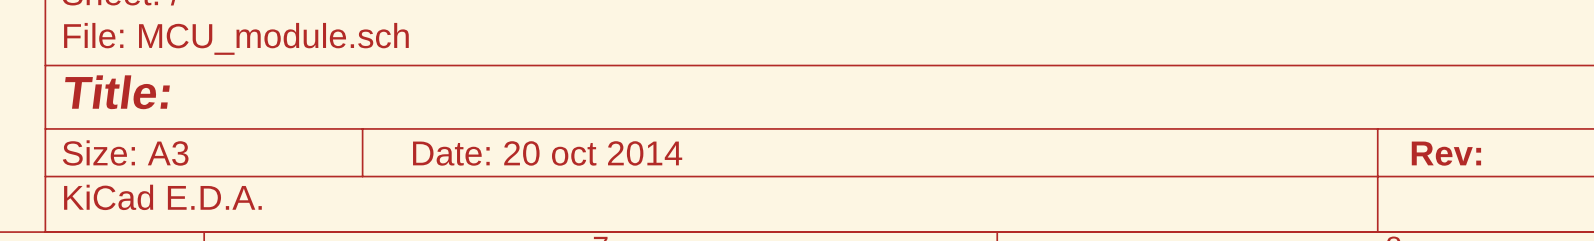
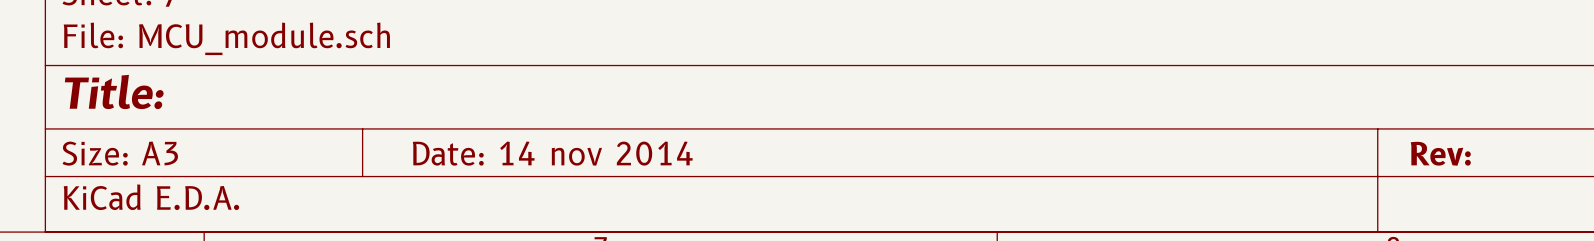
title block: Date: 20 oct 2014 (547, 153) -> Date: 14 nov 2014 (552, 153)

